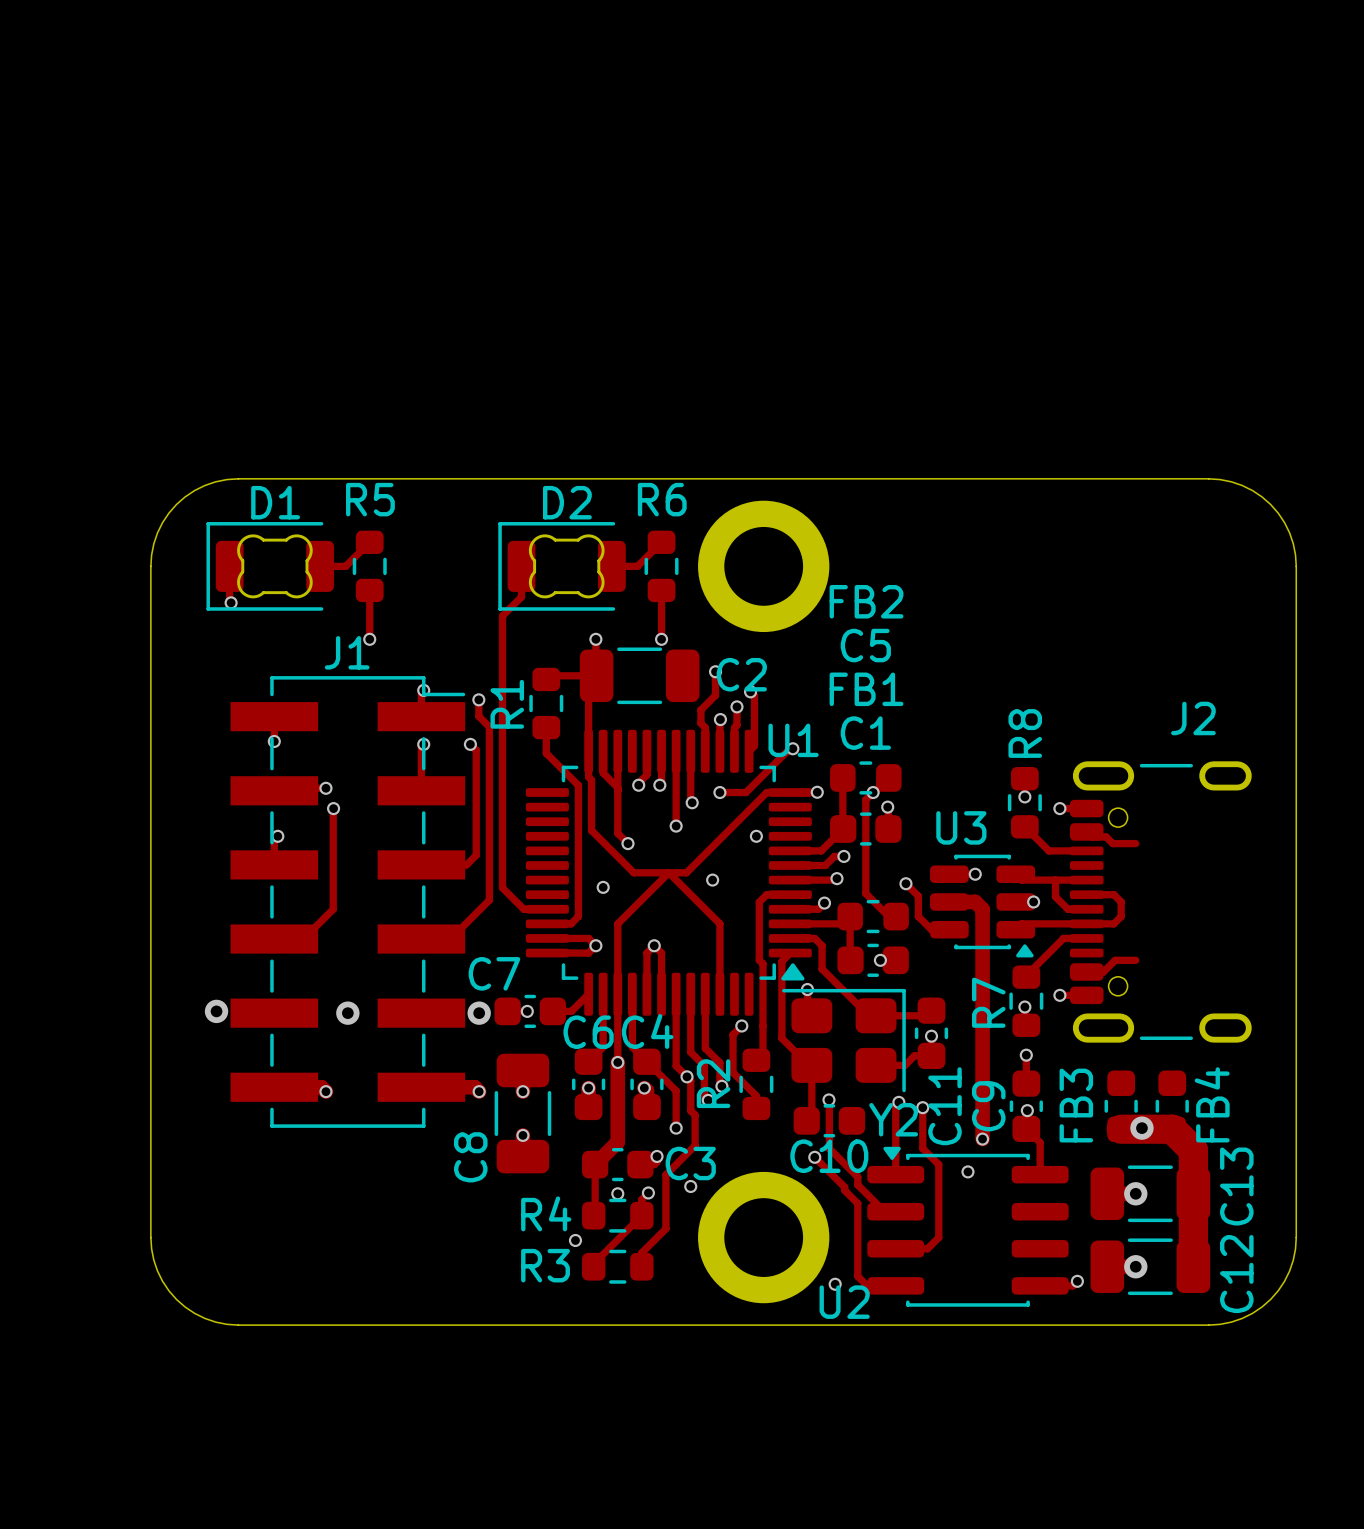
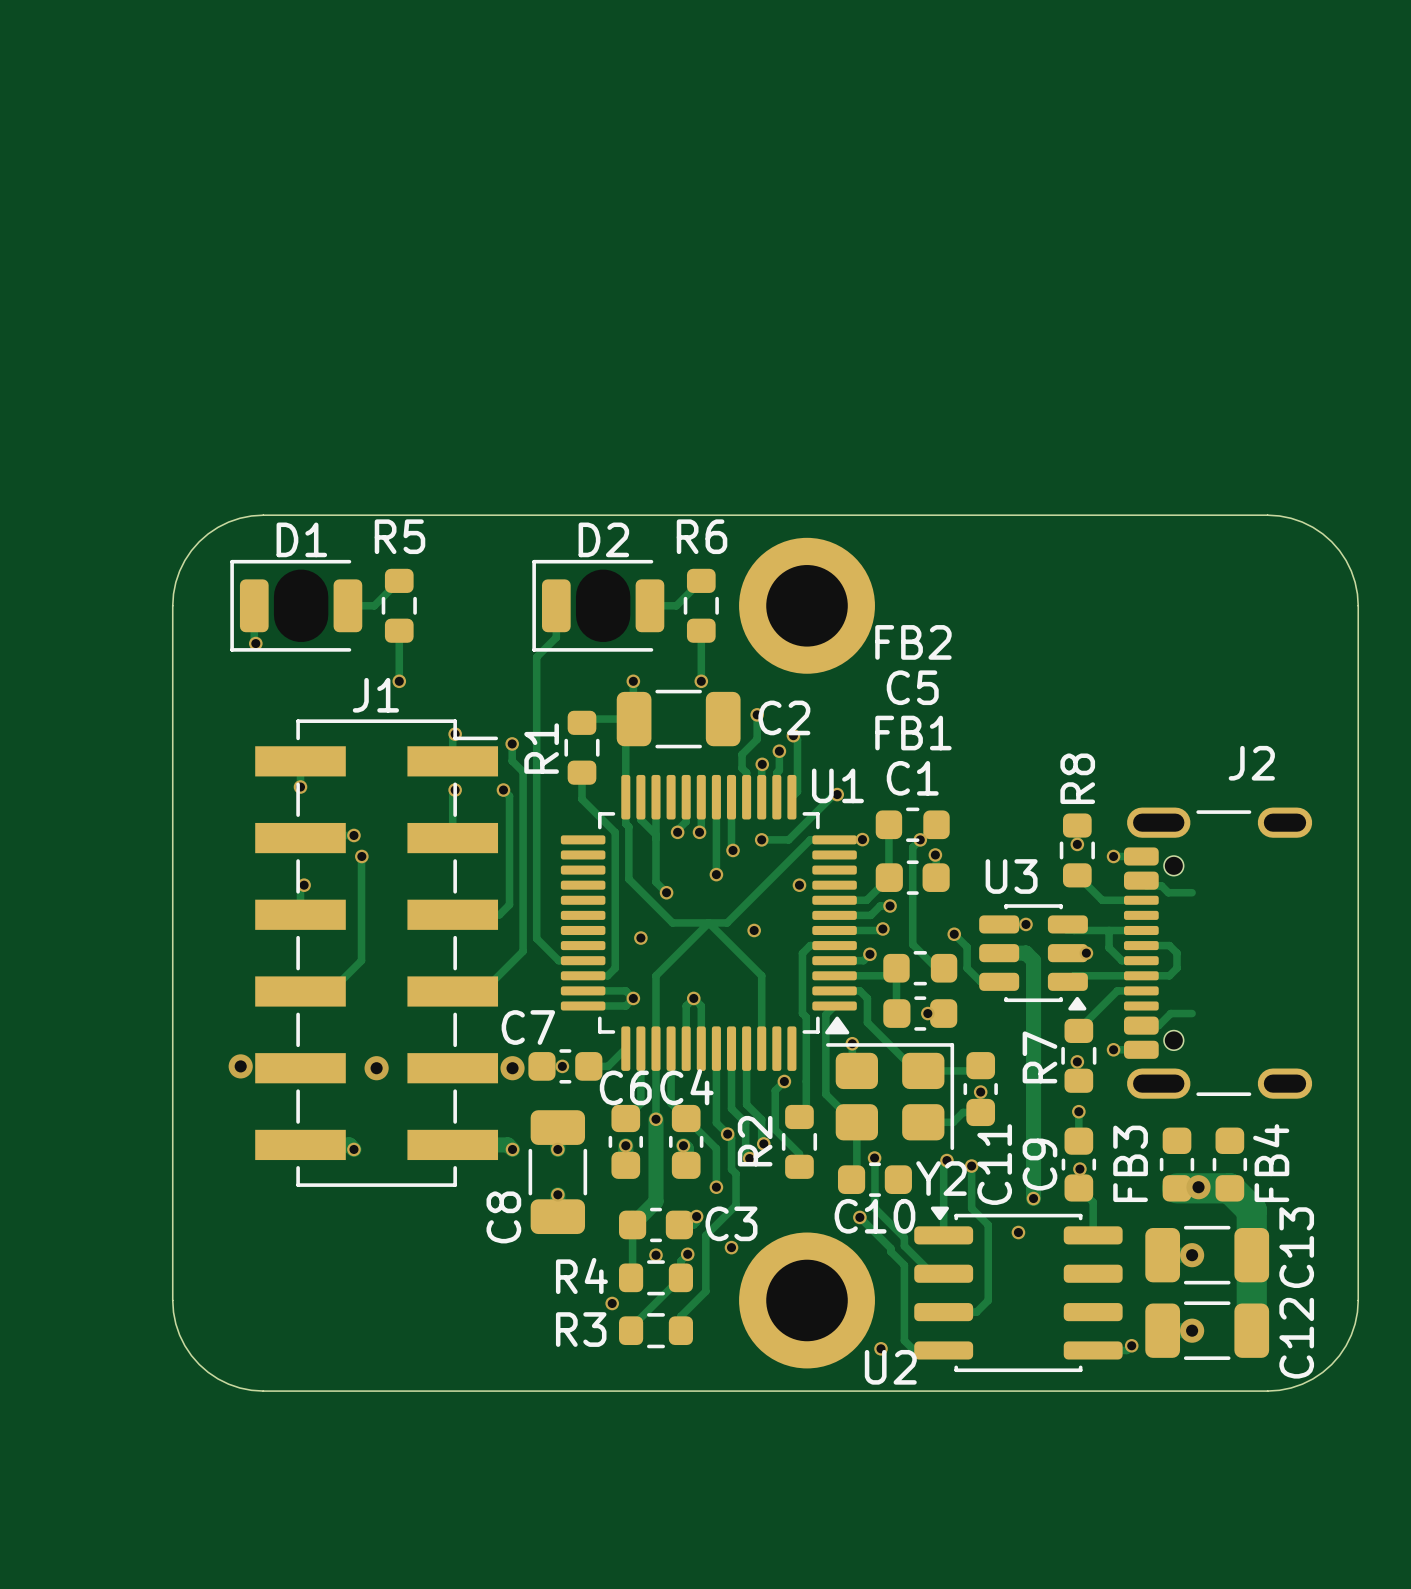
D1 footprint: [206, 522, 334, 611] -> [230, 559, 363, 652]
D2 footprint: [498, 522, 626, 611] -> [532, 559, 665, 652]

